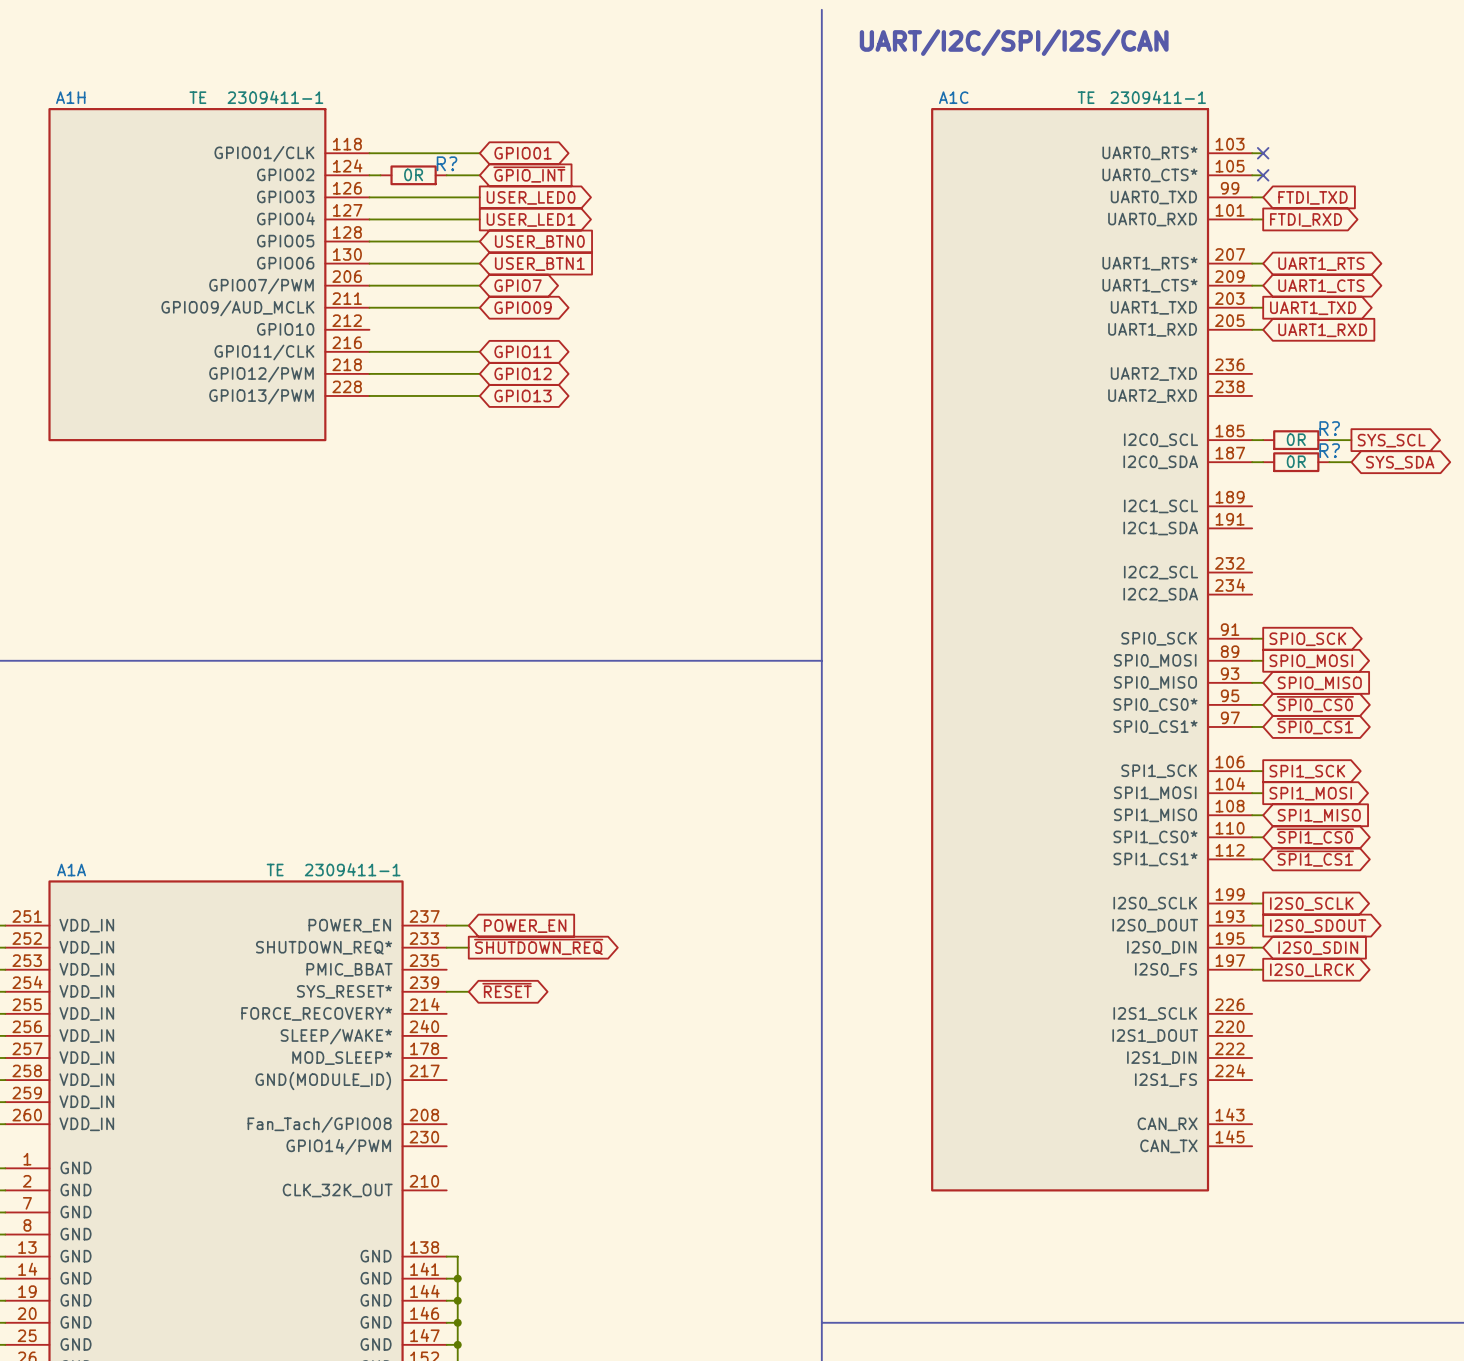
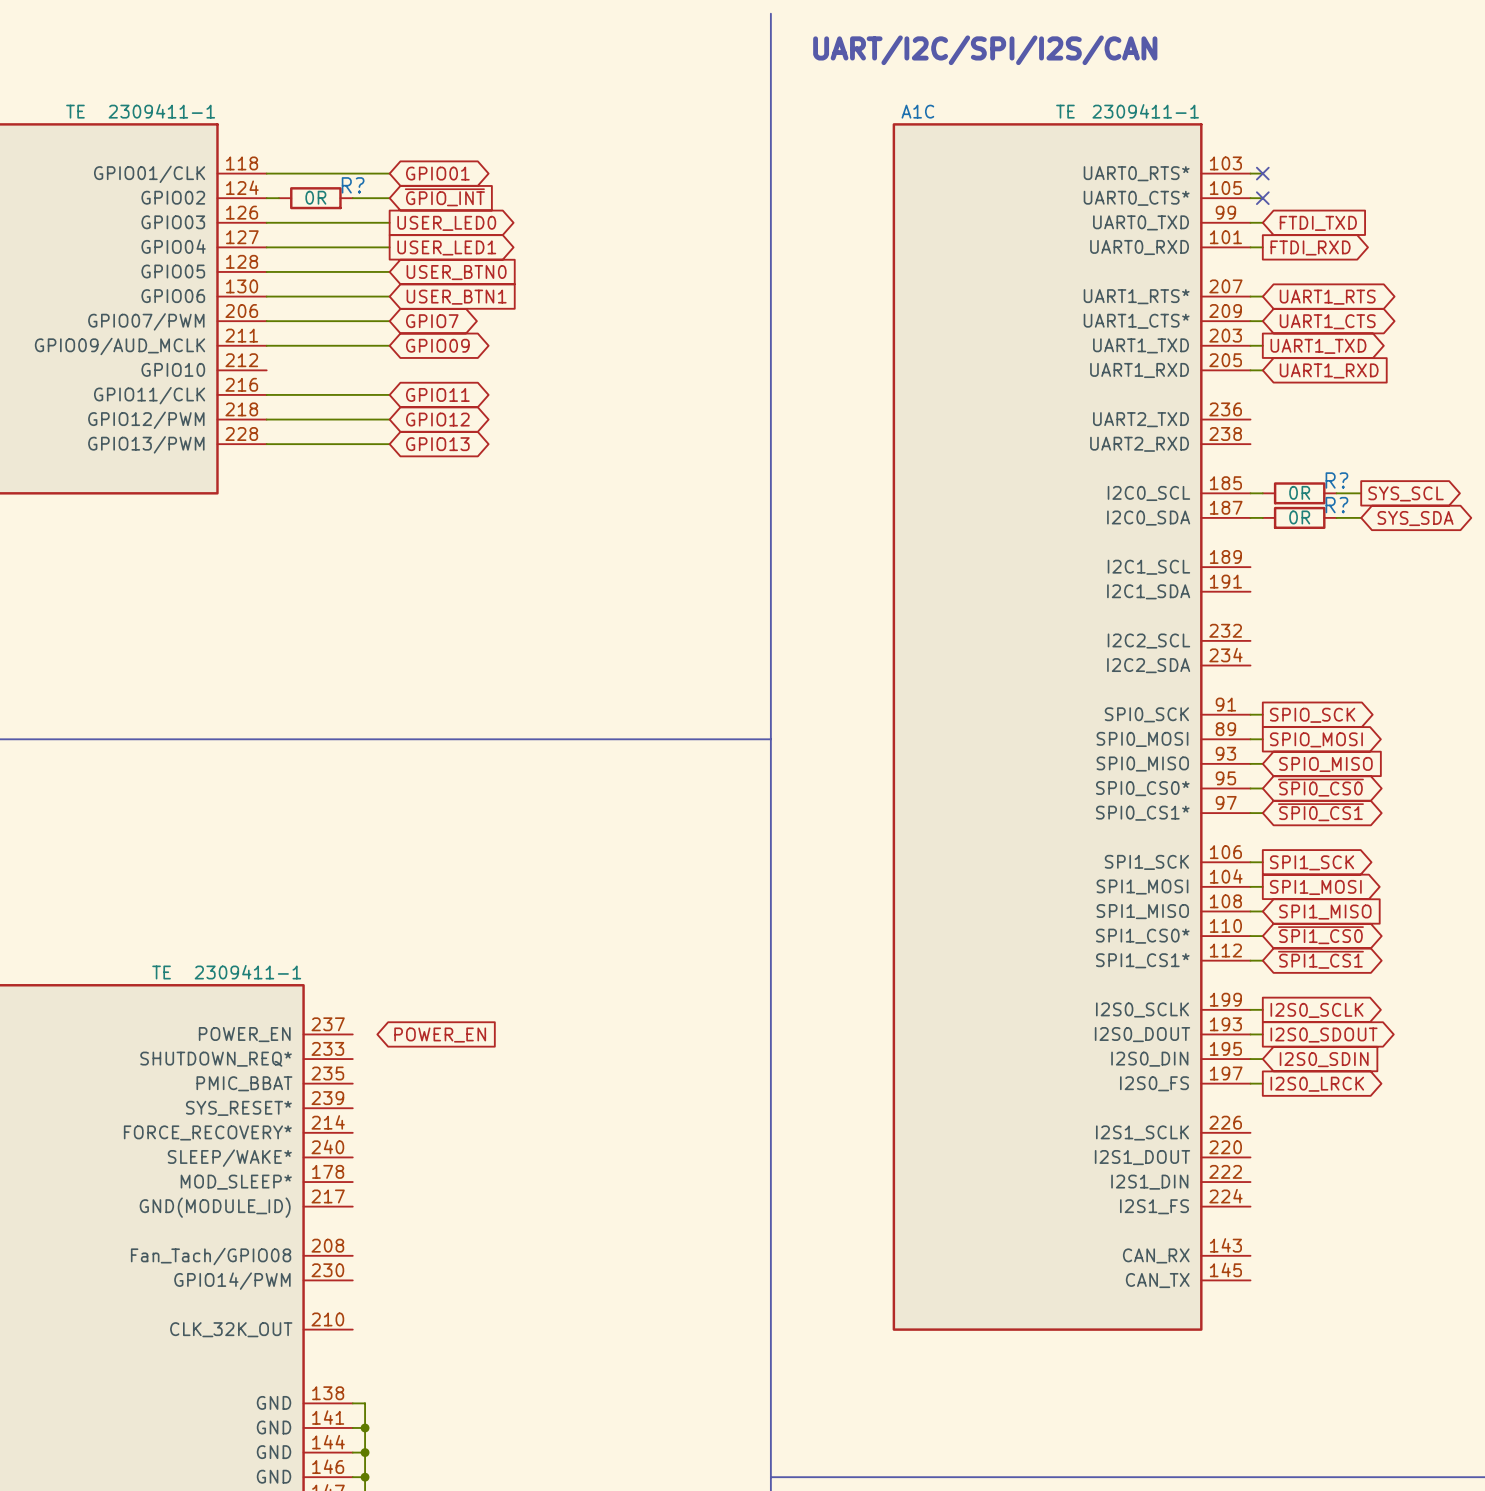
wire: (446, 925) (468, 925) -> none
global label: ~{SHUTDOWN_REQ} (538, 946) -> none
wire: (446, 947) (468, 947) -> none
global label: ~{RESET} (507, 990) -> none
wire: (446, 991) (468, 991) -> none

